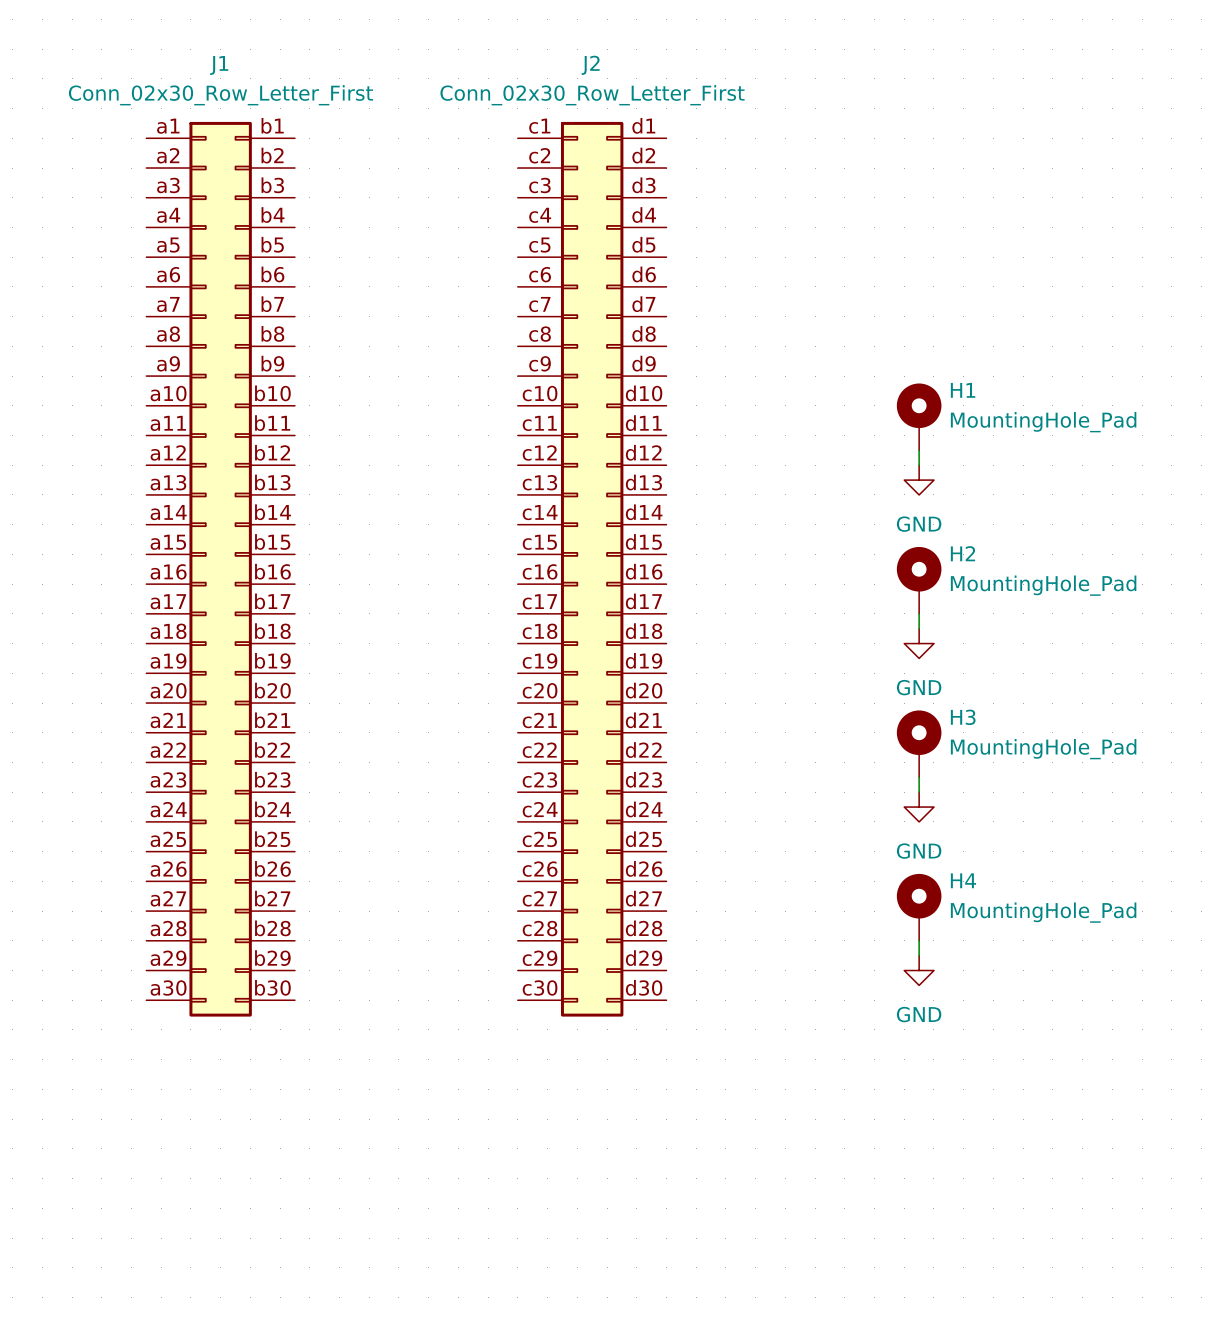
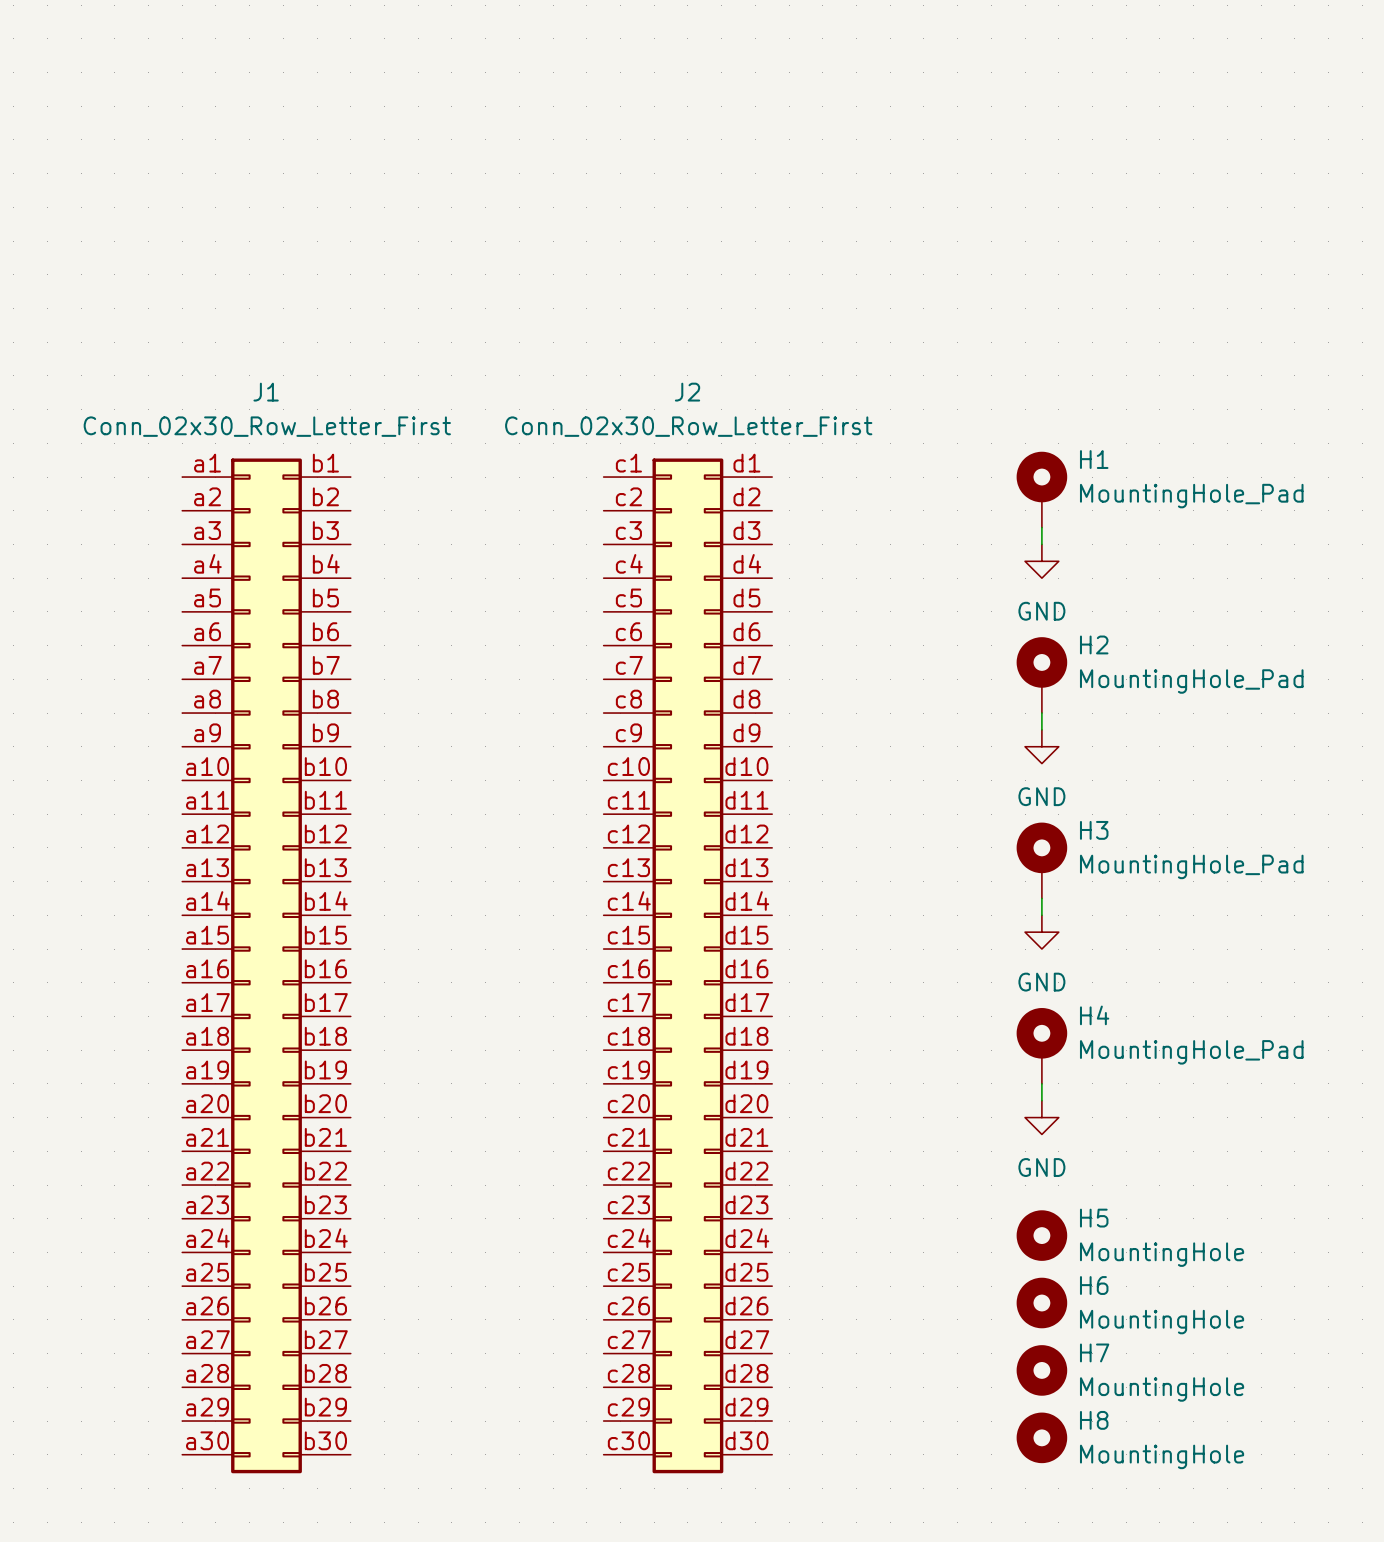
J1 position: (220, 569) -> (266, 965)
J2 position: (592, 569) -> (687, 965)
H5: none -> MountingHole (1041, 1235)
H6: none -> MountingHole (1041, 1303)
H7: none -> MountingHole (1041, 1370)
H8: none -> MountingHole (1041, 1437)

